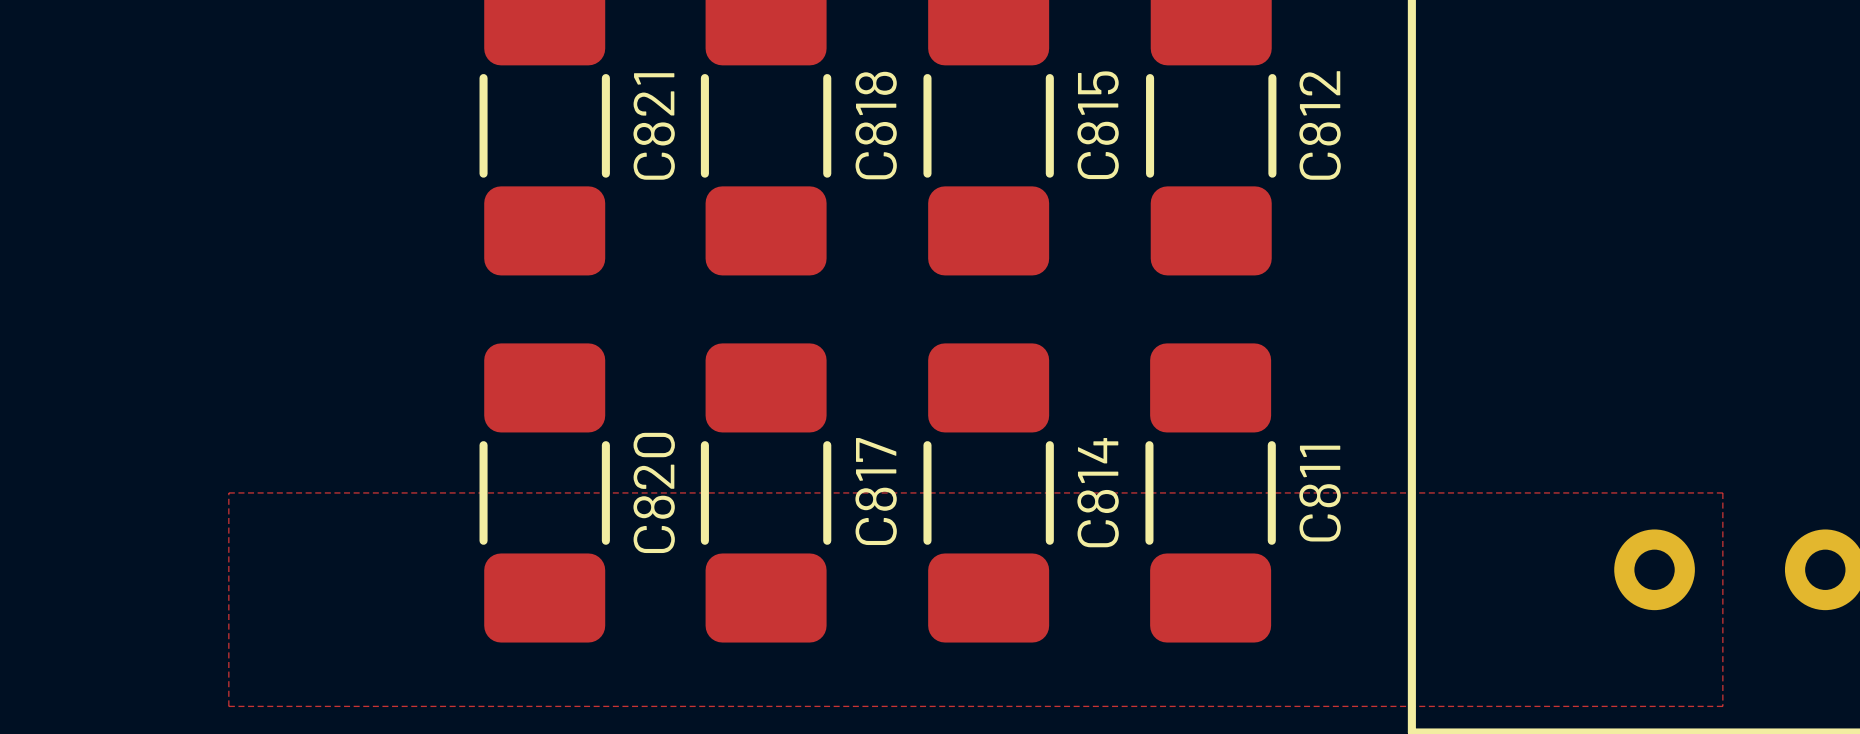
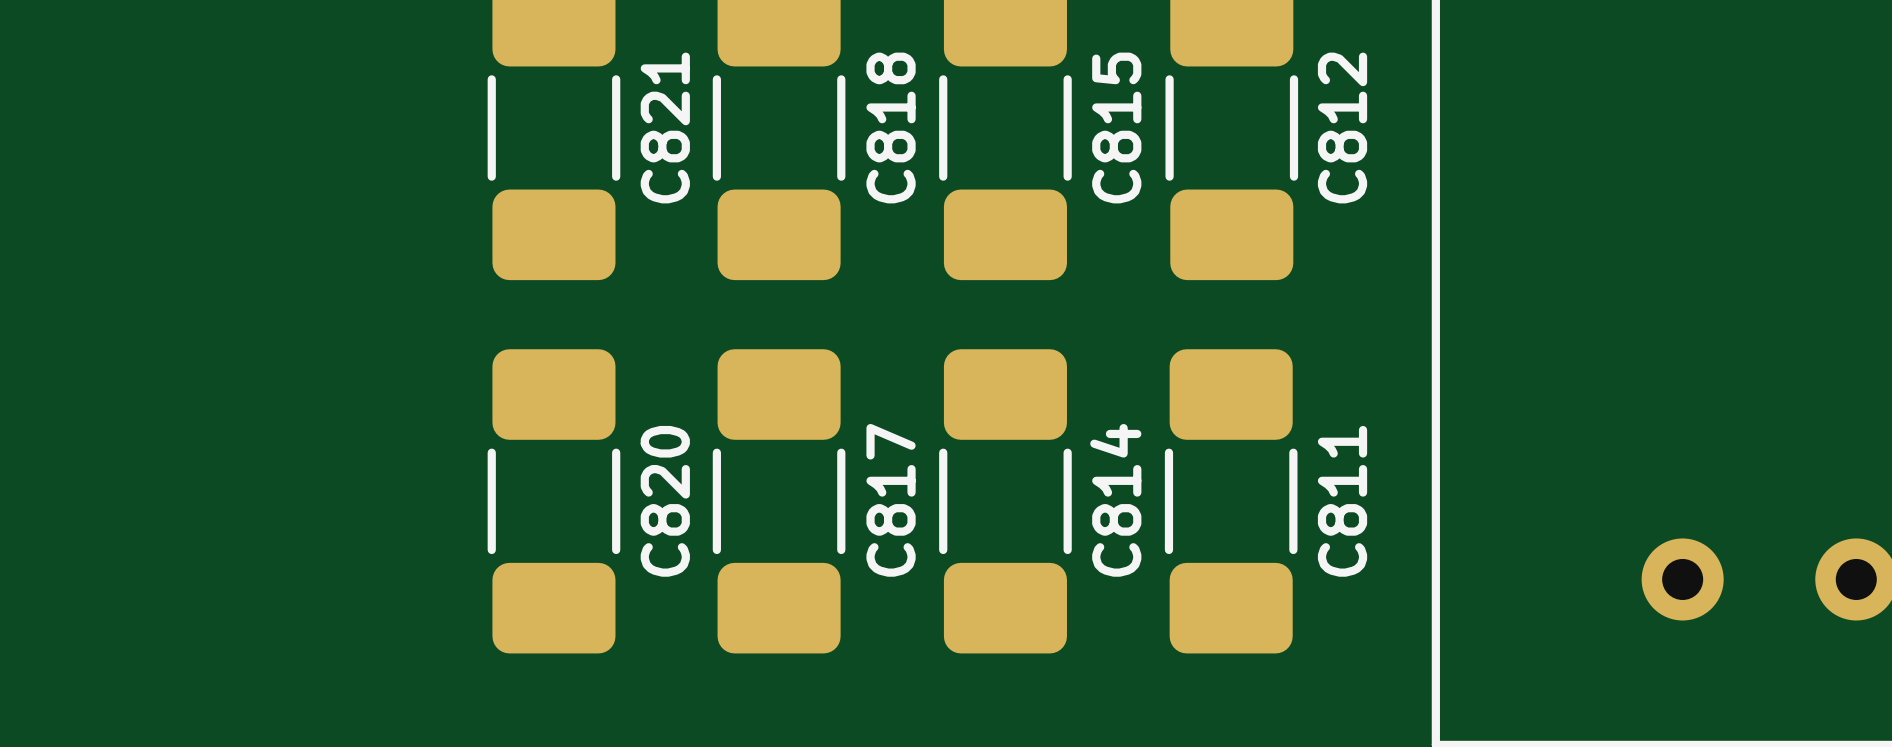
zone outline: (228, 492) (228, 706) (1722, 706) (1722, 492) (228, 492) -> none

